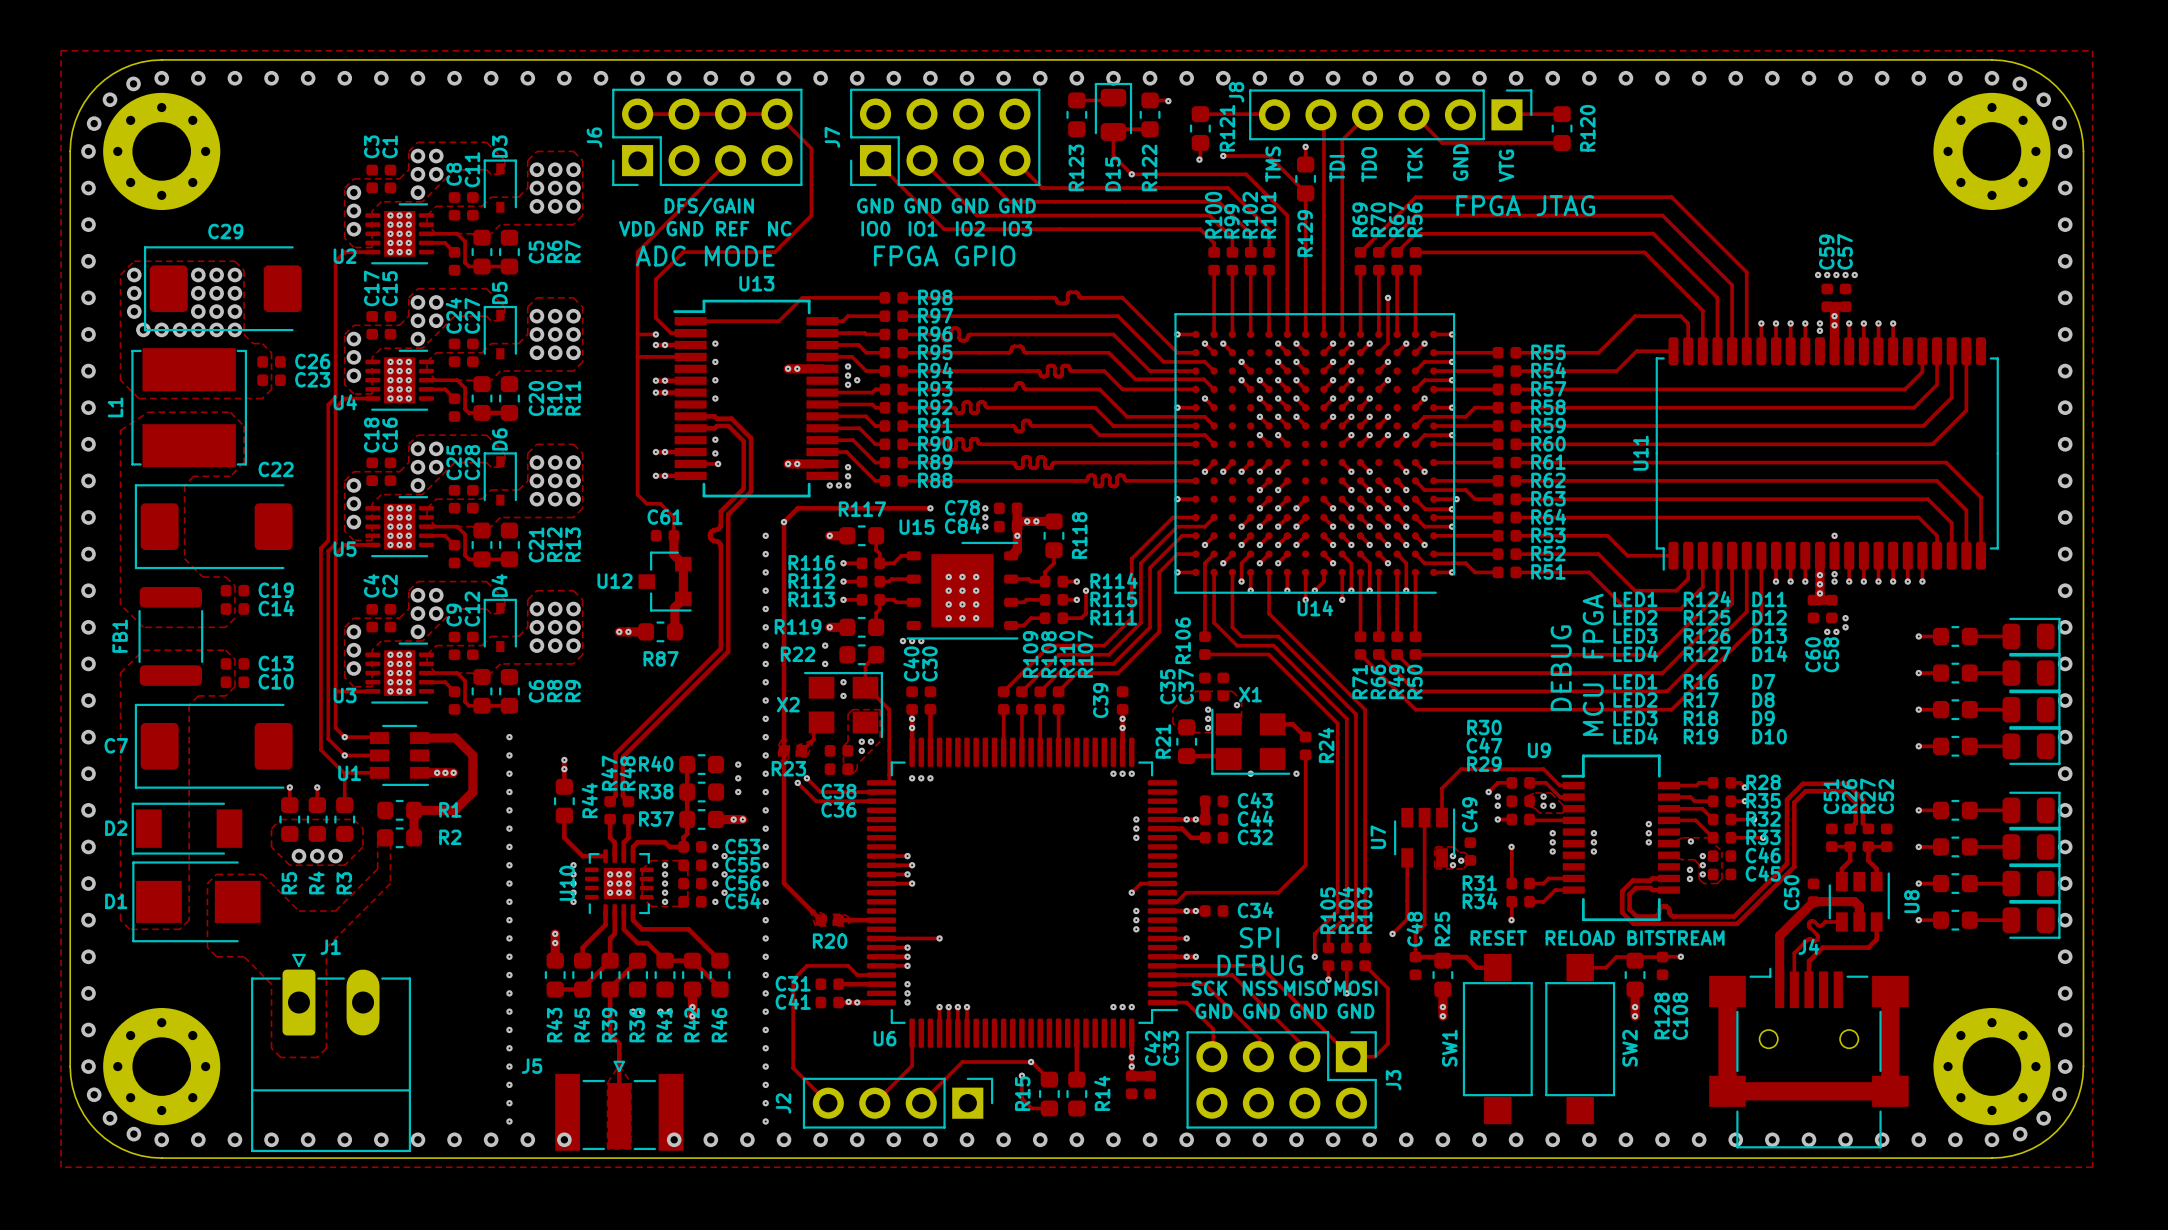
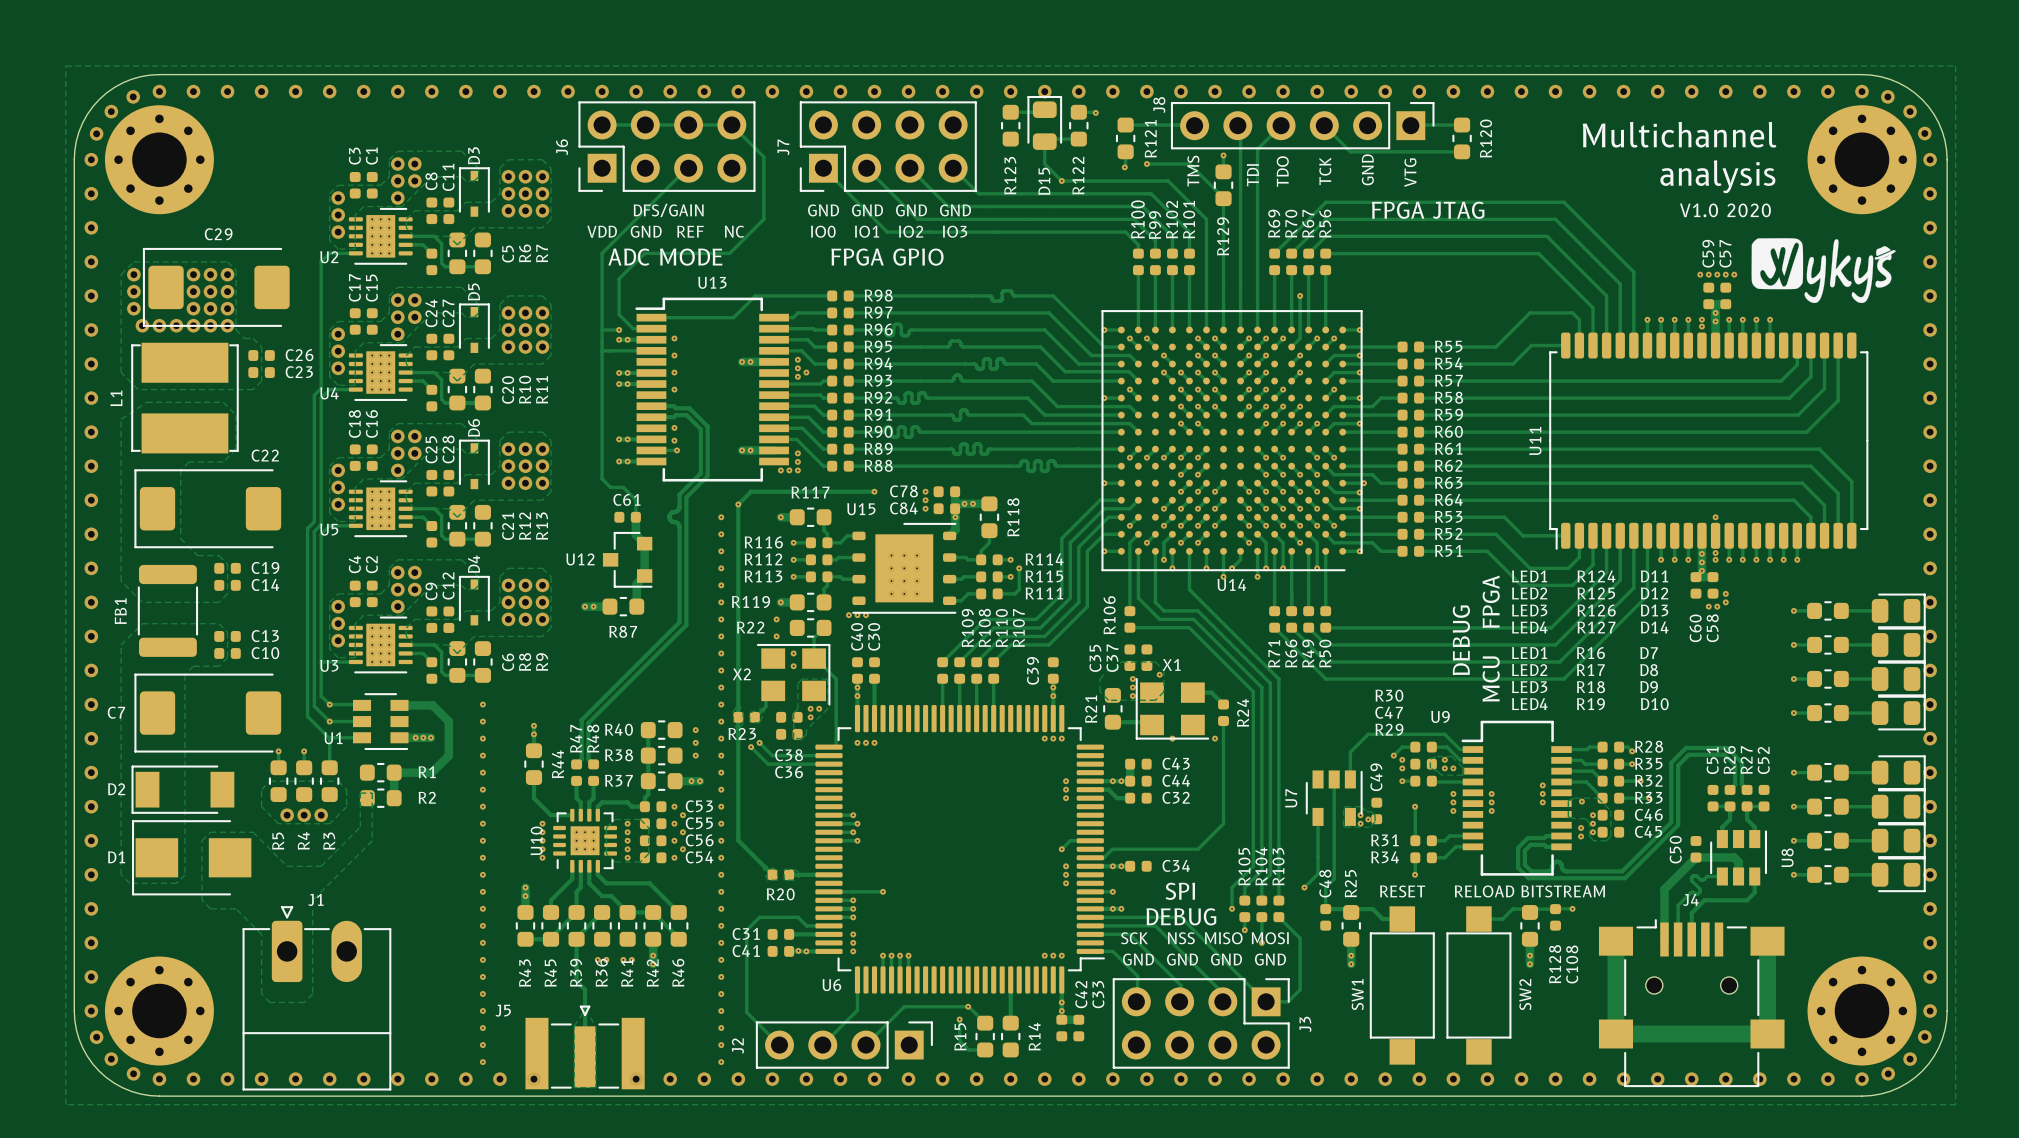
text: none -> Multichannel (1679, 134)
text: none -> analysis (1717, 176)
text: none -> V1.0 2020 (1725, 210)
drawing: none -> [1751, 238, 1896, 304]

